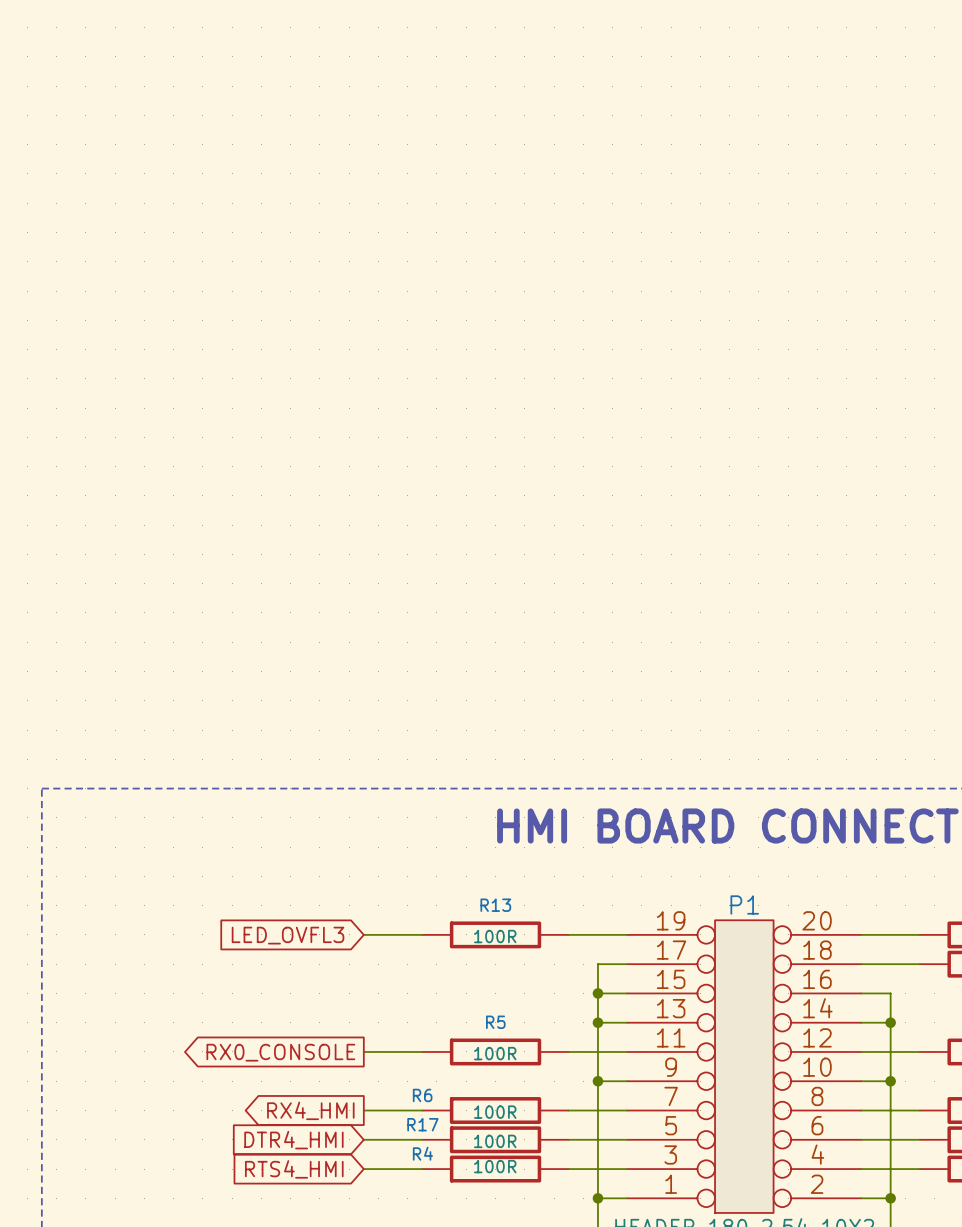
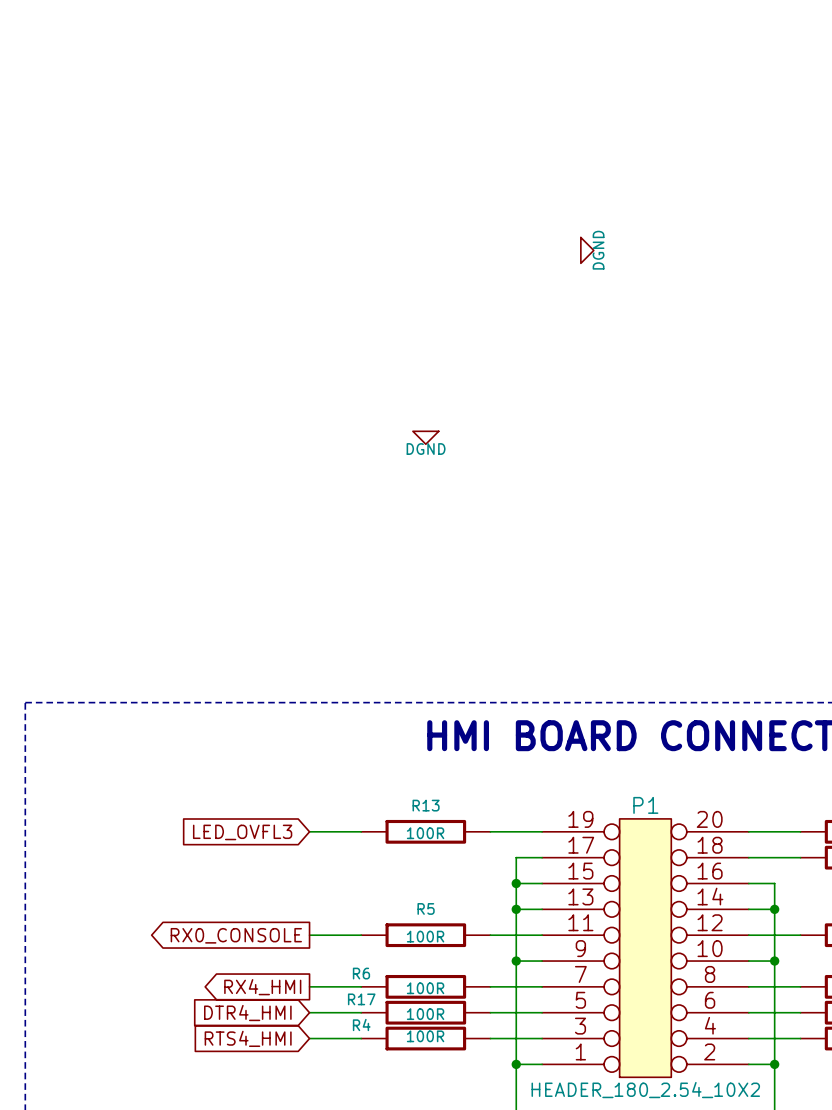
power symbol: none -> DGND (587, 250)
power symbol: none -> DGND (425, 437)

